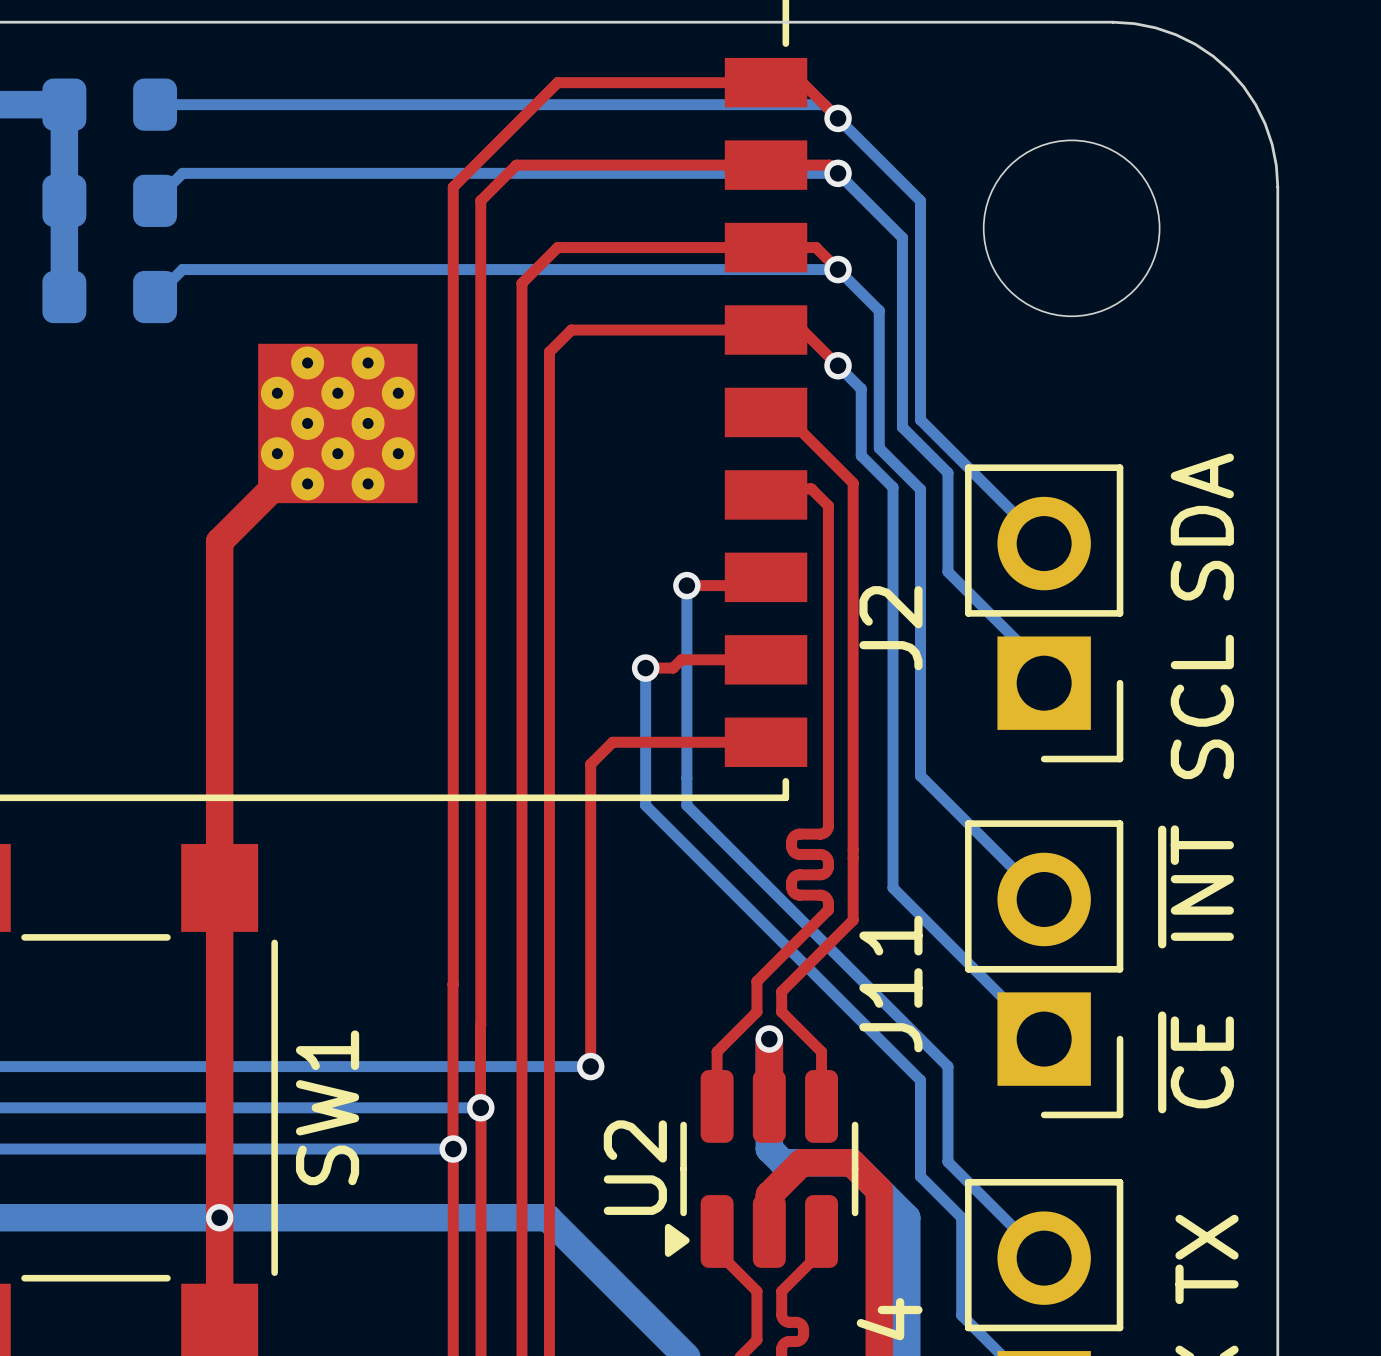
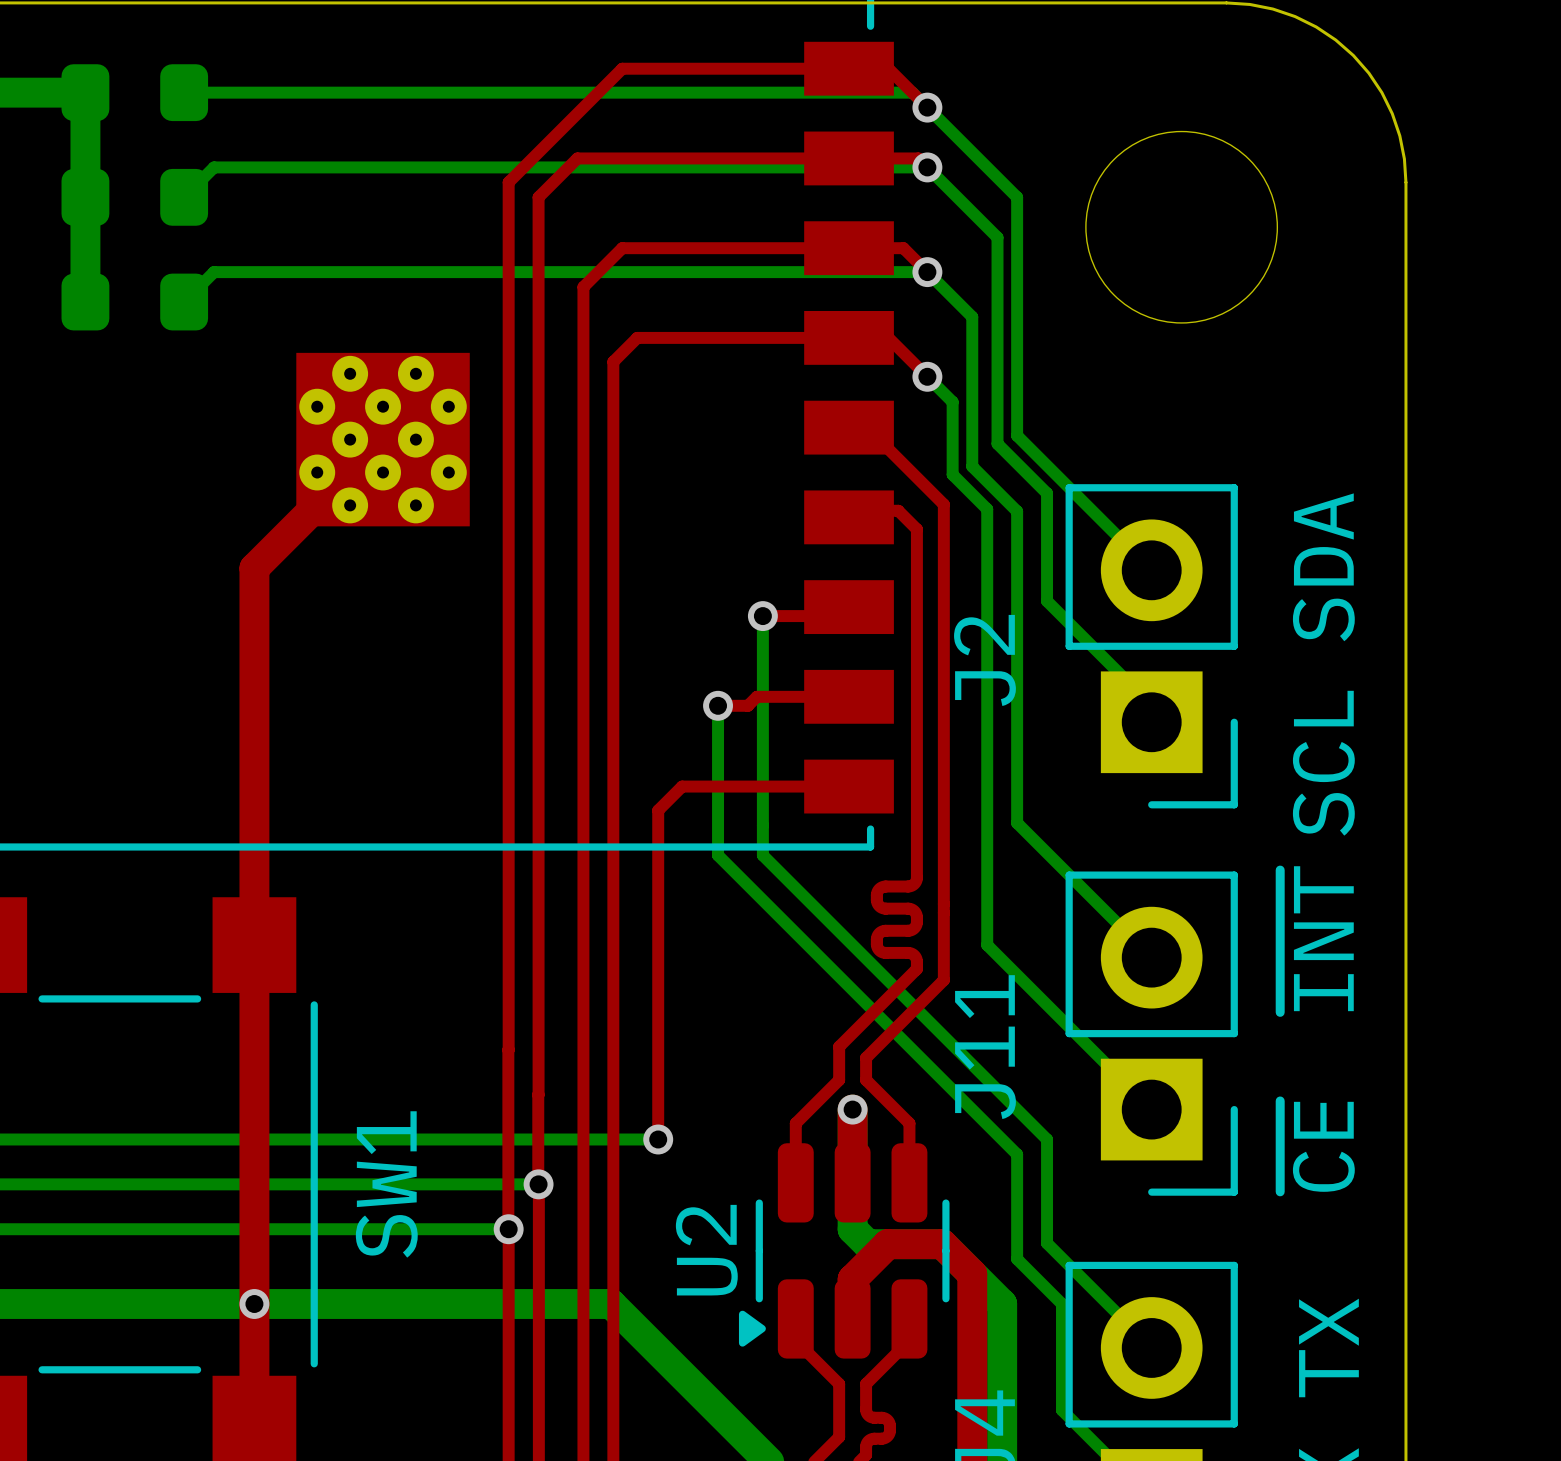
SW1 name position: SW1 (327, 1107) -> SW1 (386, 1184)

